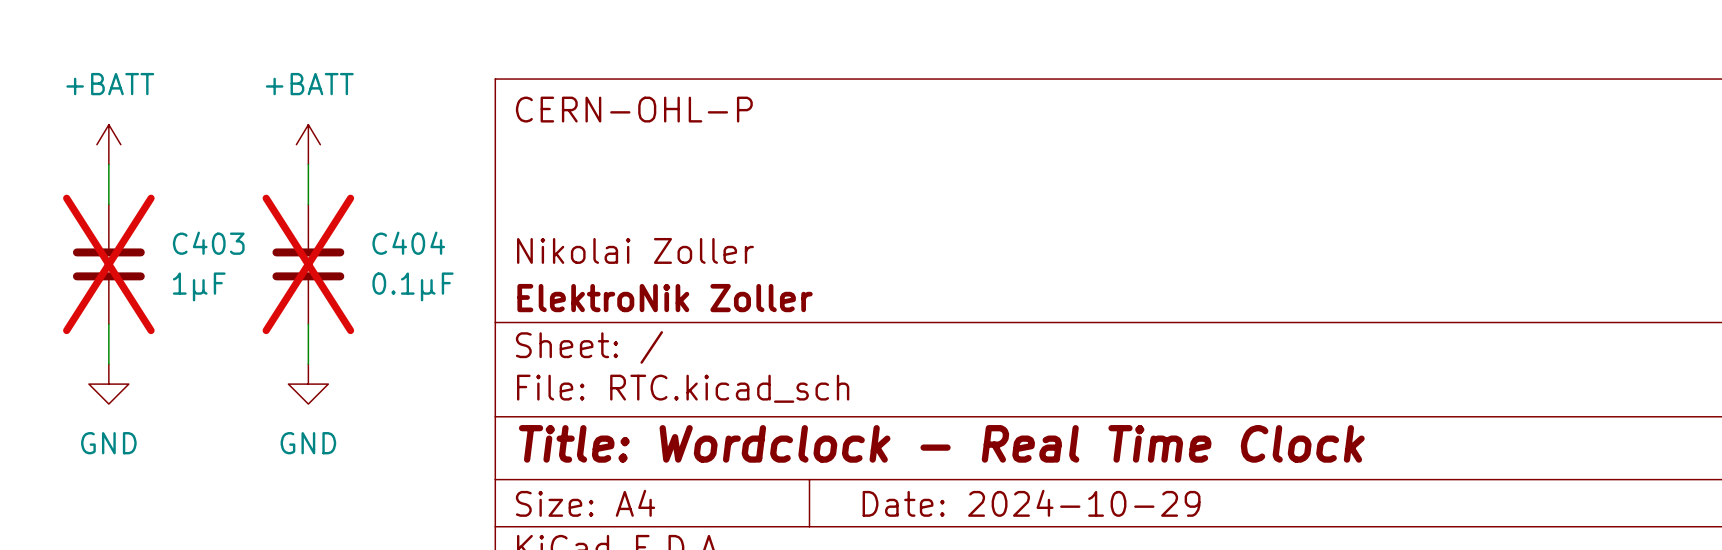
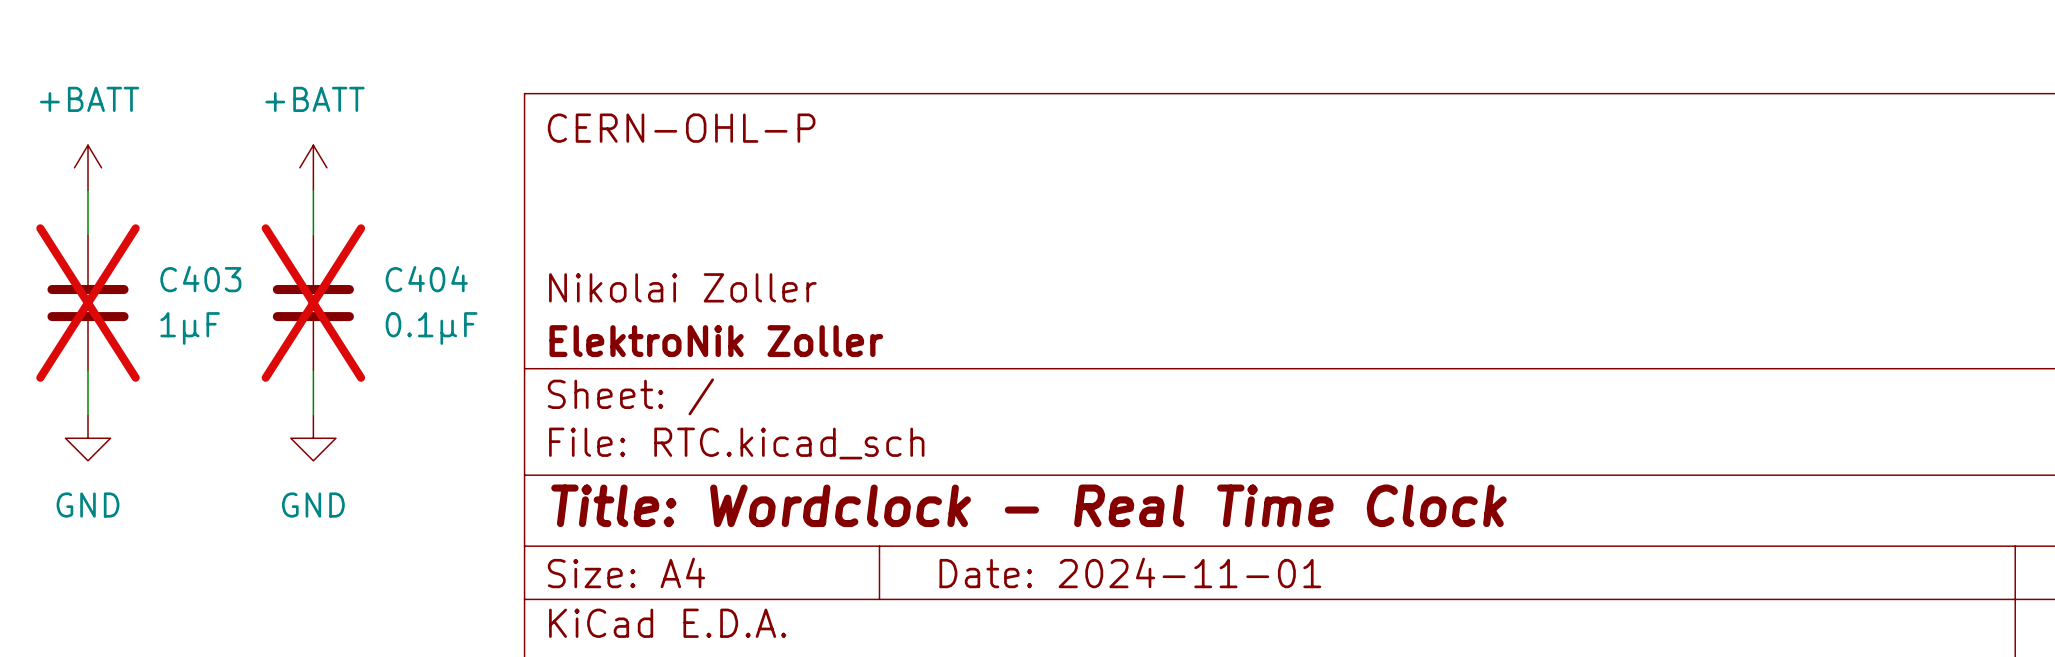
title block: Date: 2024-10-29 (1031, 503) -> Date: 2024-11-01 (1130, 572)

